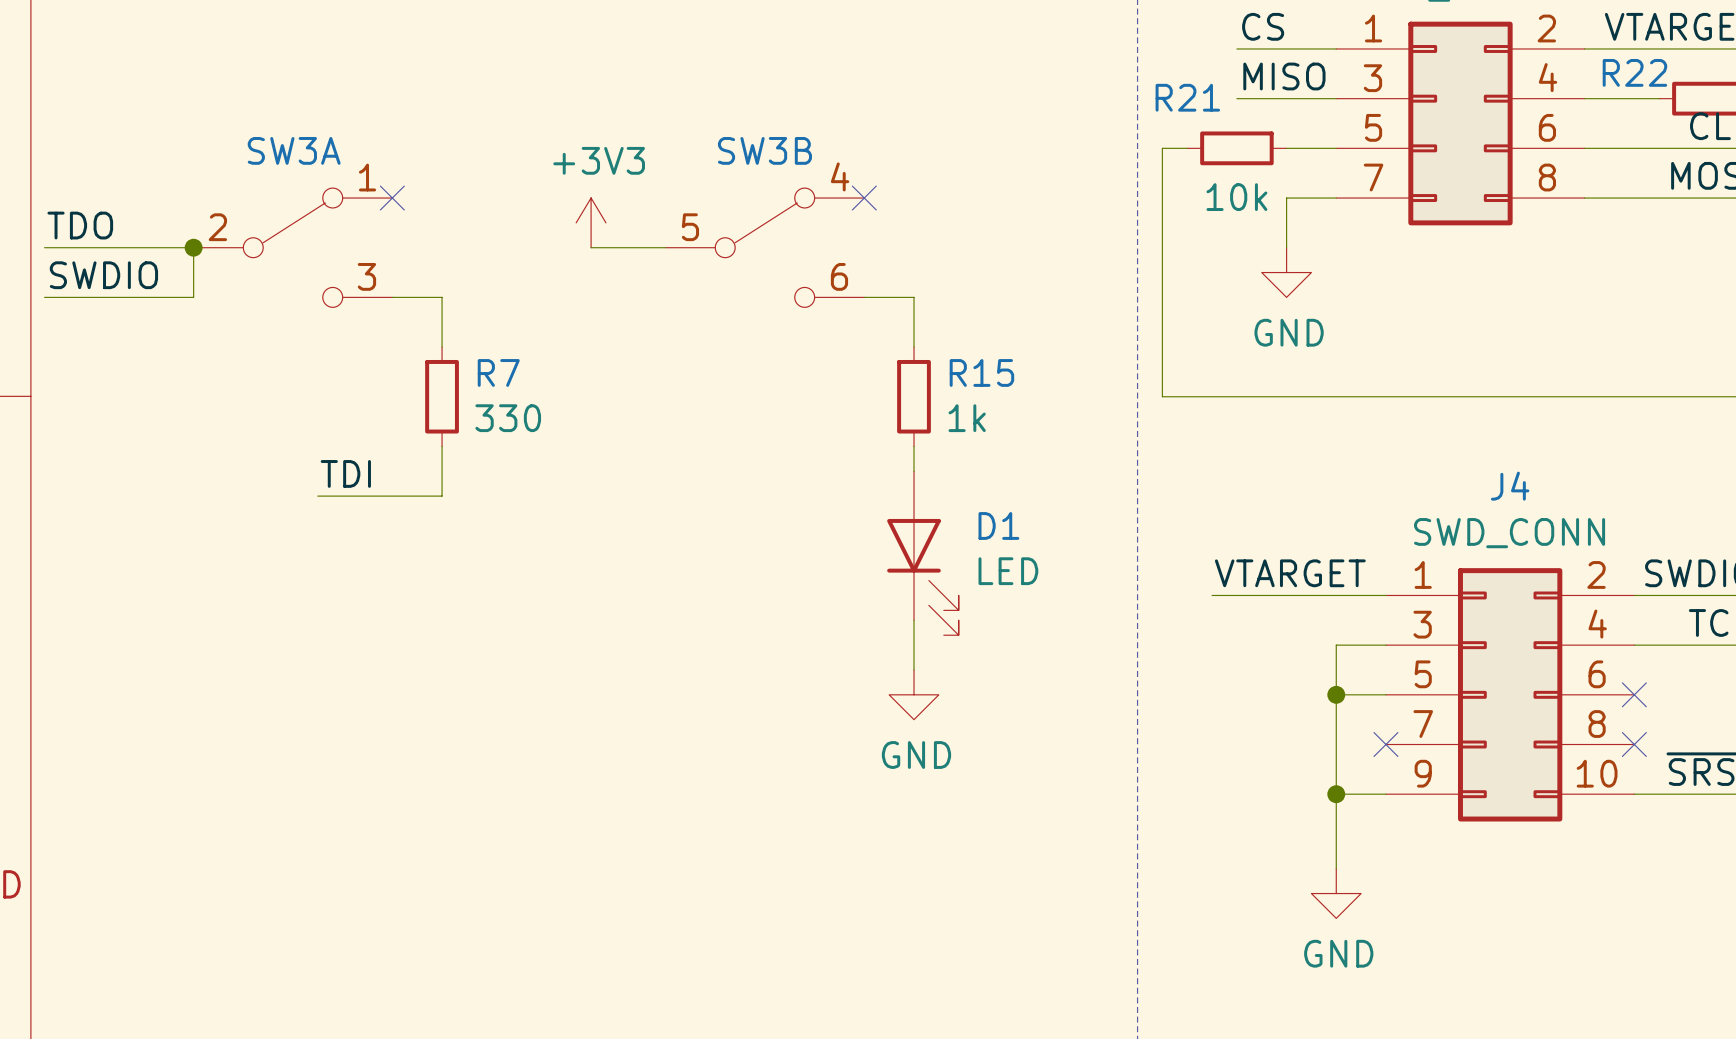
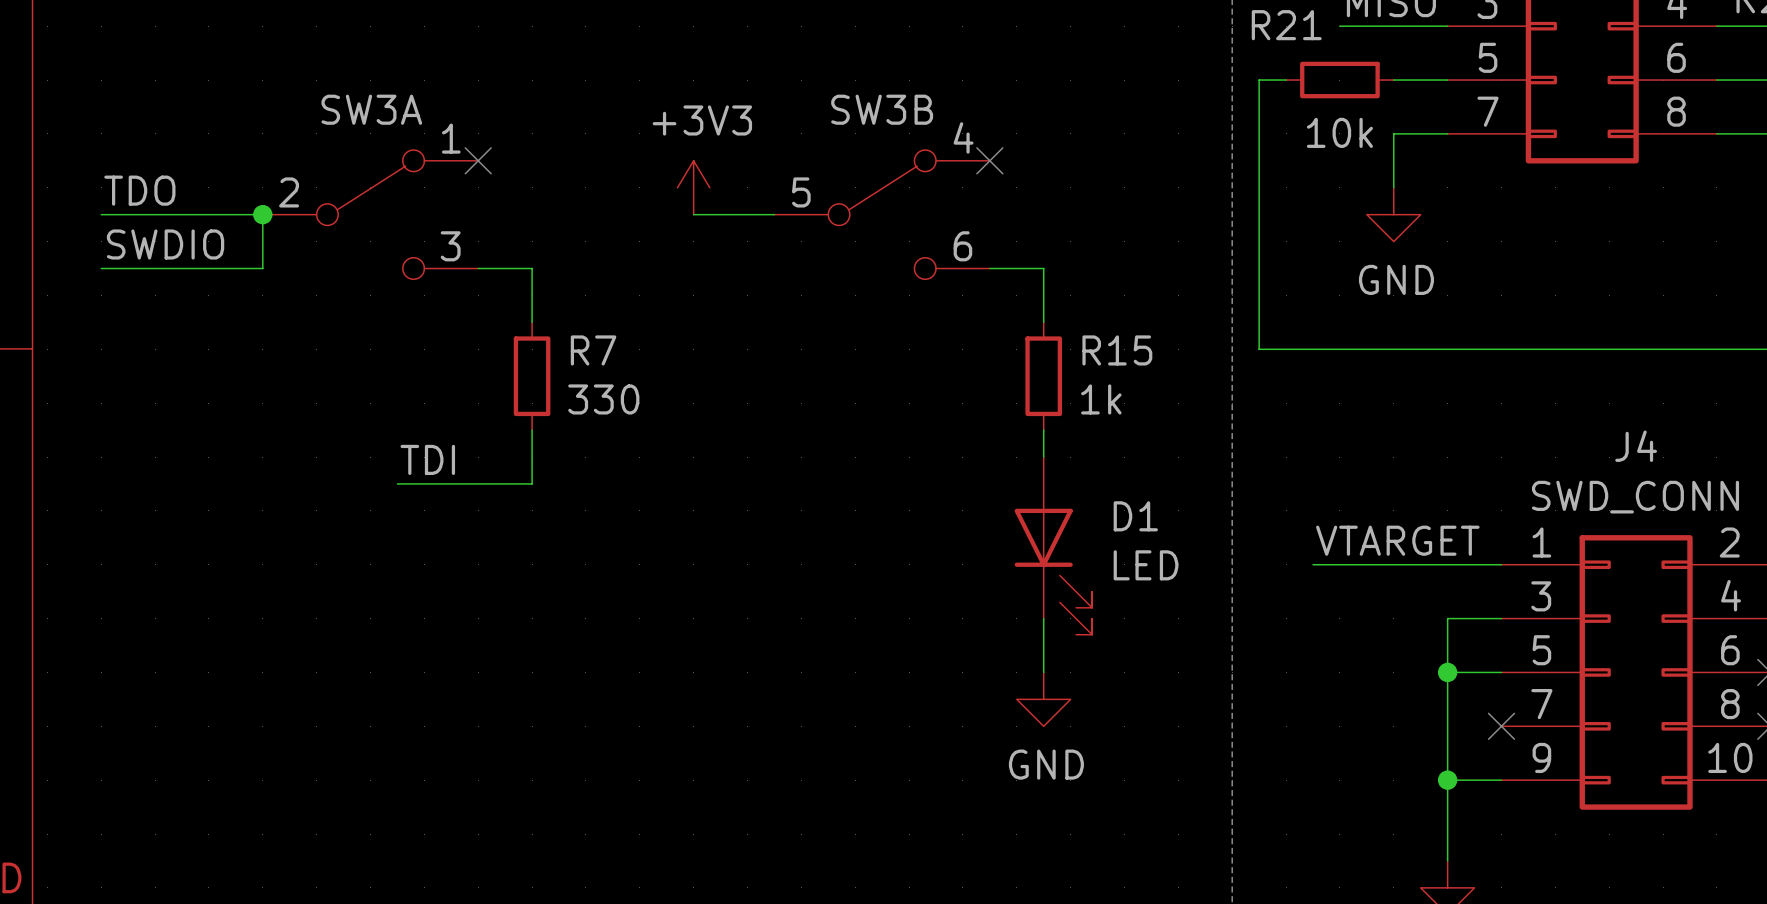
no-connect mark position: (392, 198) -> (478, 160)
no-connect mark position: (864, 198) -> (989, 160)
power symbol position: +3V3 (591, 222) -> +3V3 (693, 187)
label position: TDO (80, 225) -> TDO (139, 190)
wire: (44, 247) (193, 247) (193, 297) (44, 297) -> (101, 214) (262, 214) (262, 268) (101, 268)
junction position: (193, 247) -> (262, 214)
SW3A position: (293, 247) -> (370, 214)
wire: (591, 247) (665, 247) -> (693, 214) (774, 214)
SW3B position: (764, 247) -> (882, 214)
label position: SWDIO (103, 275) -> SWDIO (165, 244)
wire: (392, 297) (442, 297) (442, 347) -> (478, 268) (532, 268) (532, 322)
wire: (864, 297) (913, 297) (913, 347) -> (989, 268) (1043, 268) (1043, 322)
R7 position: (442, 396) -> (532, 376)
R15 position: (913, 396) -> (1043, 376)
wire: (442, 446) (442, 496) (317, 496) -> (532, 430) (532, 483) (397, 483)
wire: (913, 446) (913, 471) -> (1043, 430) (1043, 457)
label position: TDI (345, 473) -> TDI (427, 459)
D1 position: (922, 553) -> (1053, 545)
wire: (913, 620) (913, 669) -> (1043, 618) (1043, 672)
power symbol position: GND (913, 694) -> GND (1043, 699)

